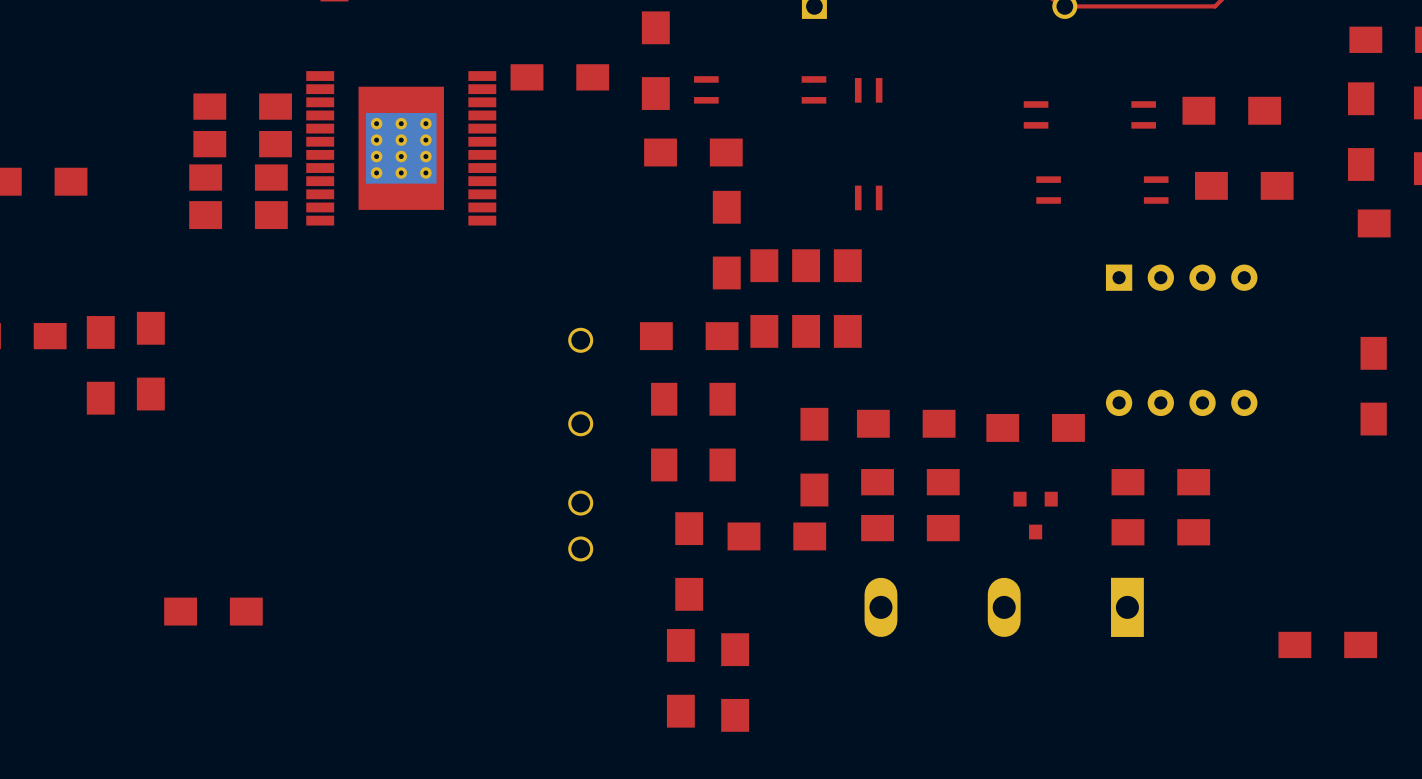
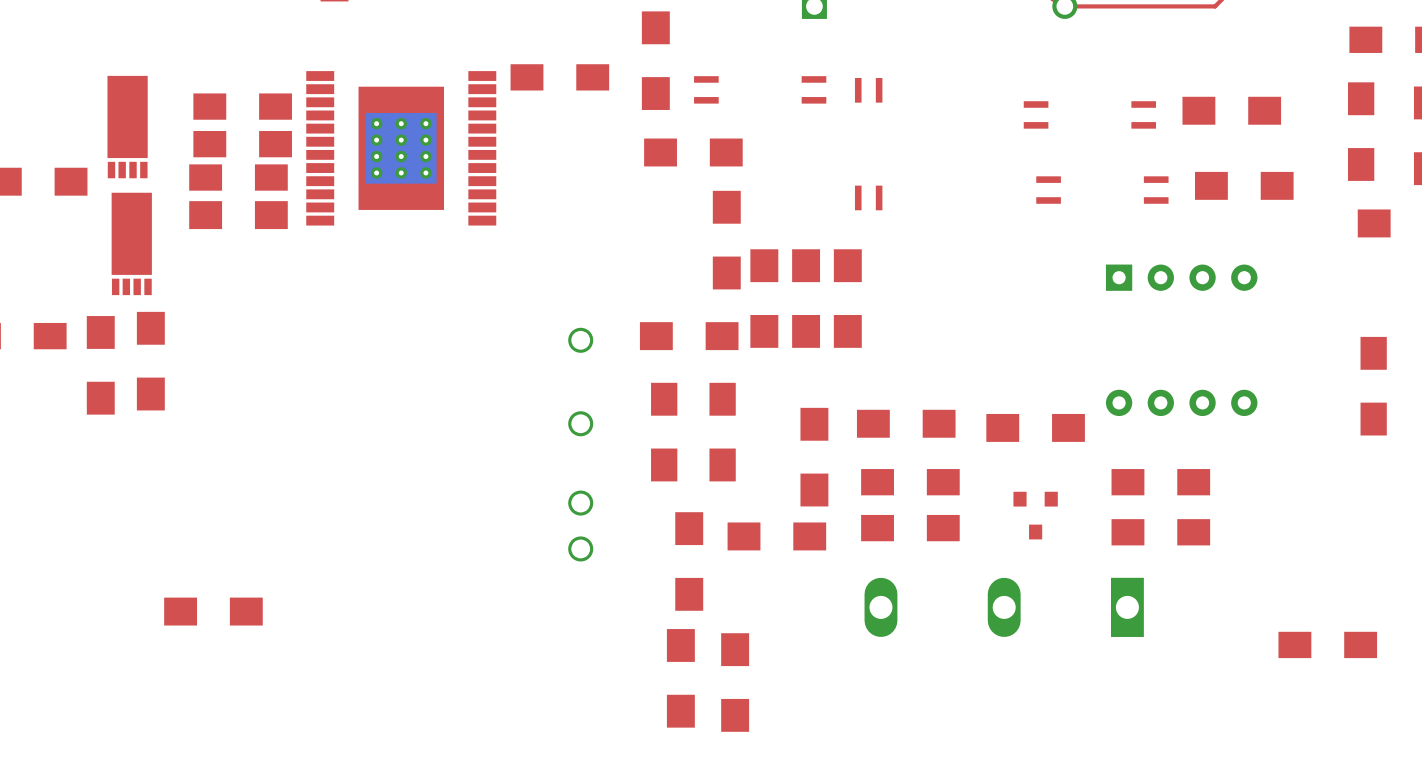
part: none -> (127, 127)
part: none -> (131, 243)

